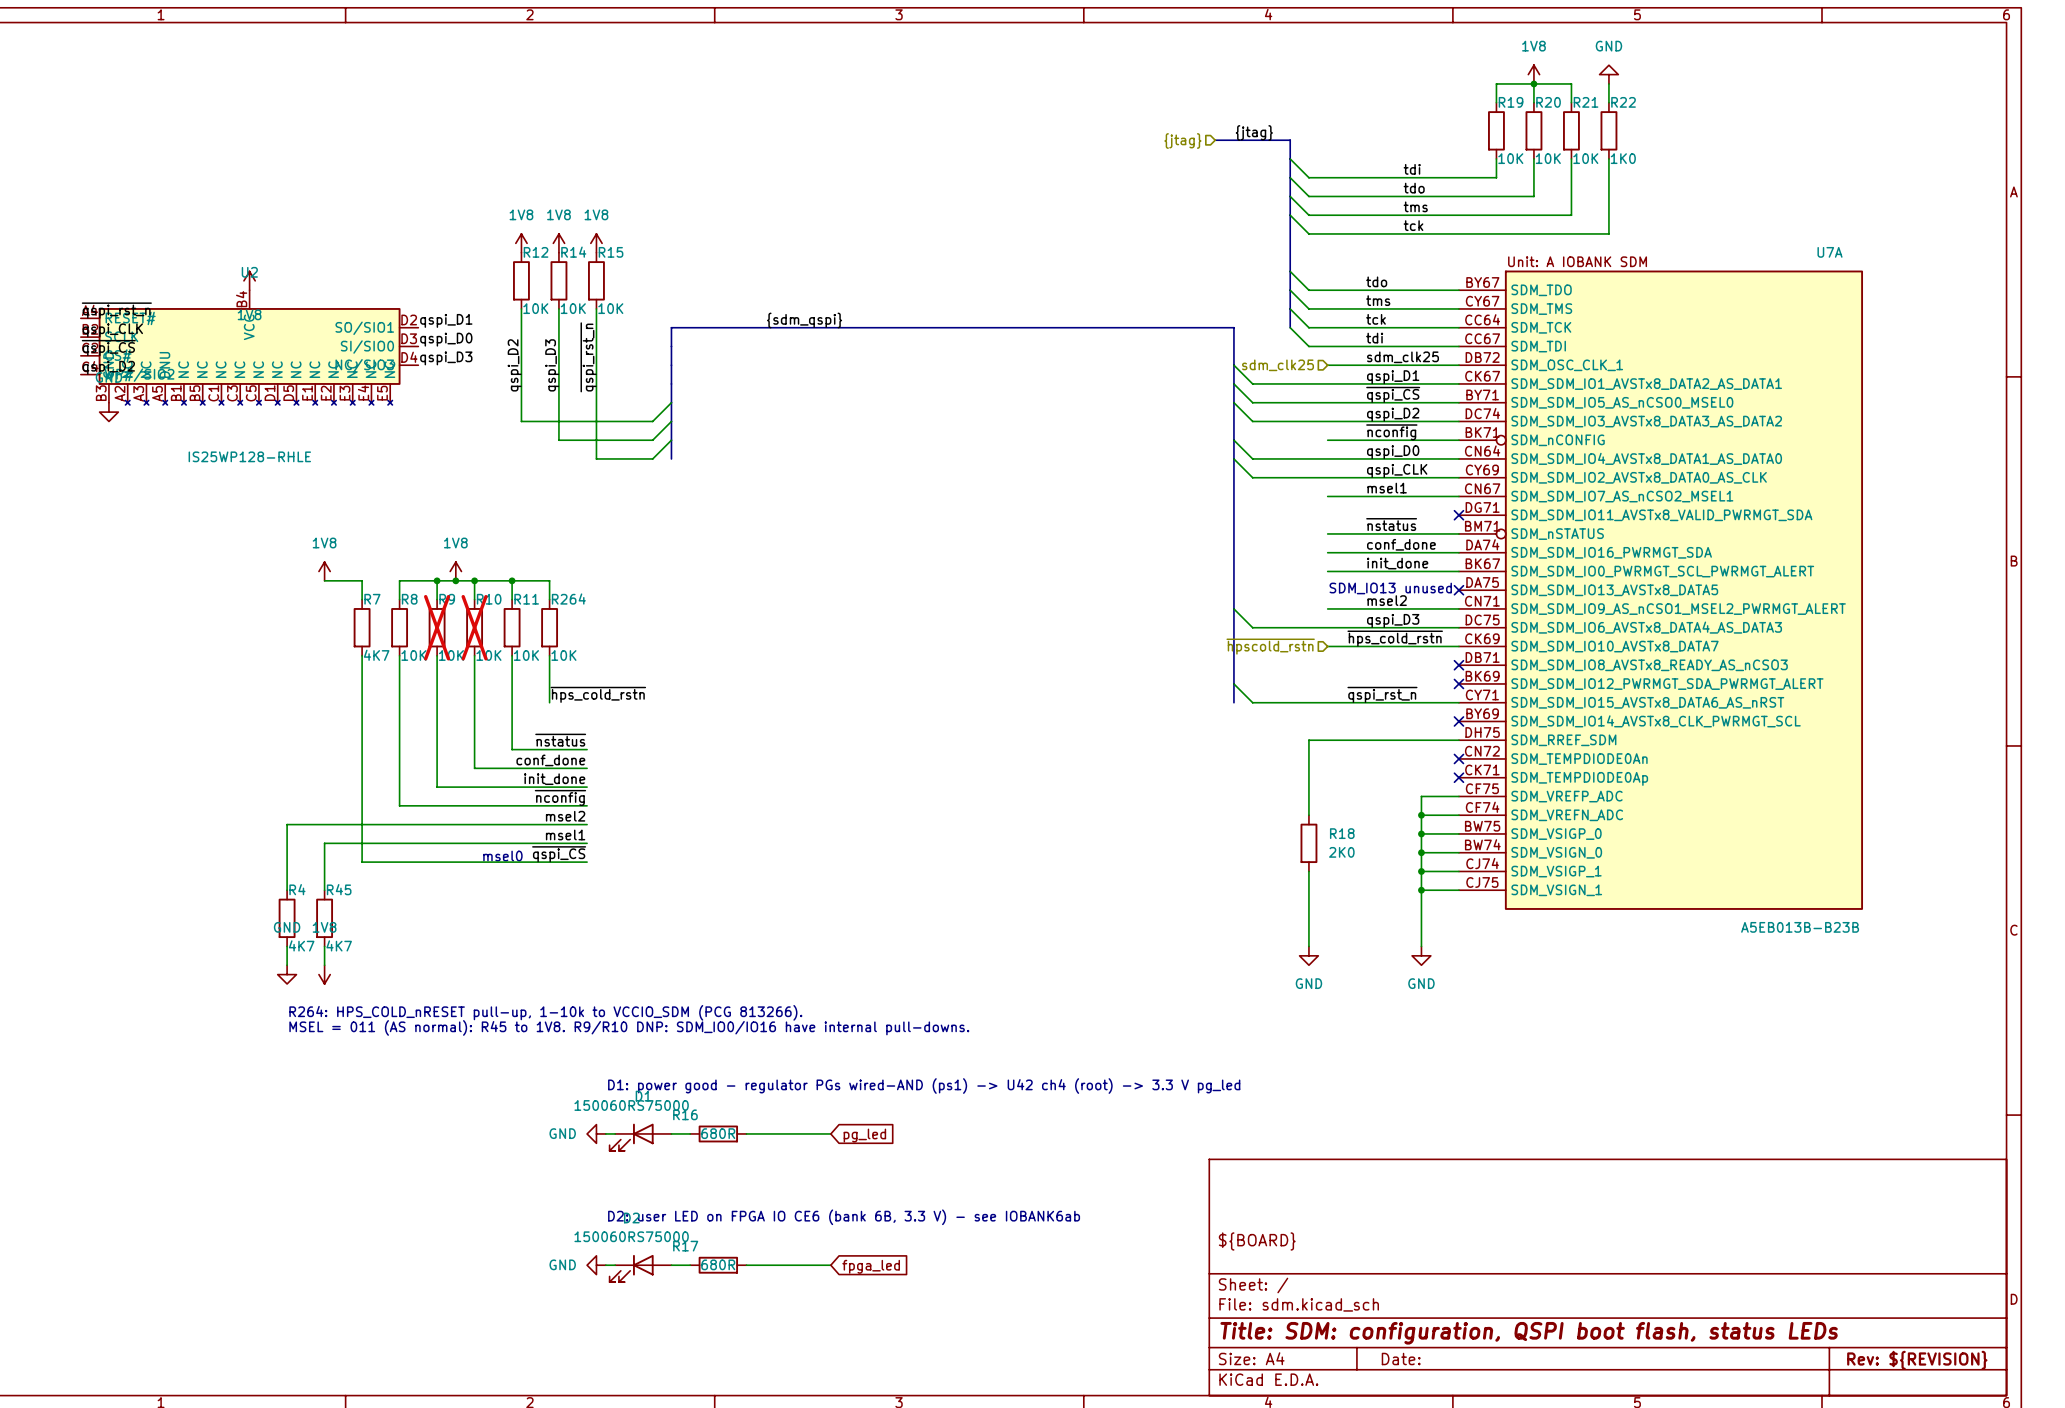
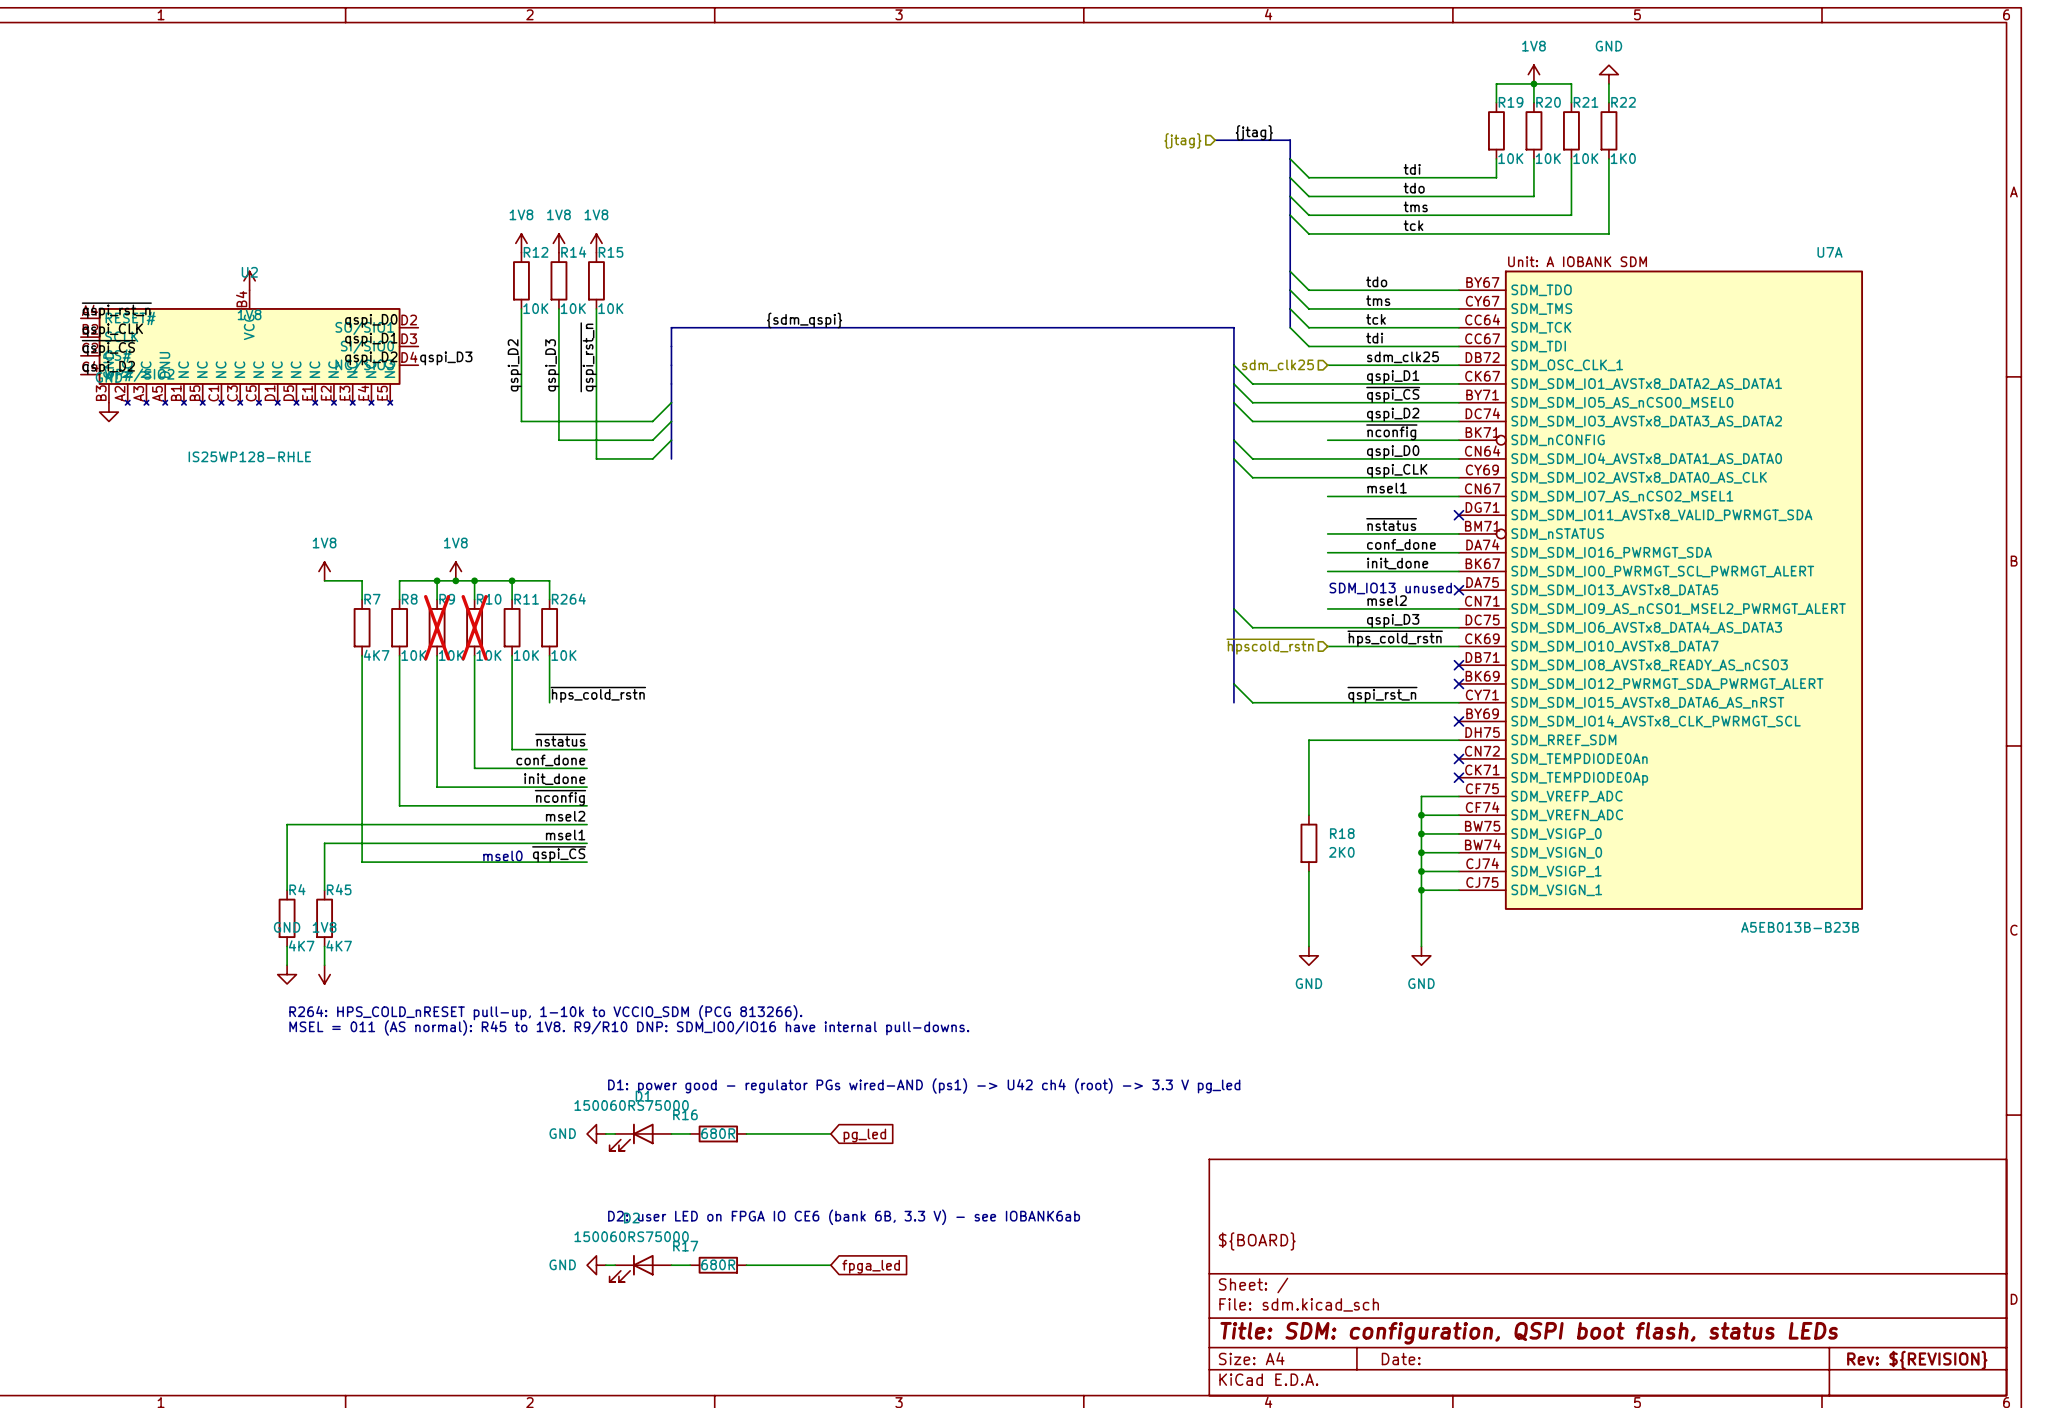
label position: qspi_D1 (446, 320) -> qspi_D1 (371, 339)
label position: qspi_D0 (446, 339) -> qspi_D0 (371, 320)
label: none -> qspi_D2 (371, 358)

